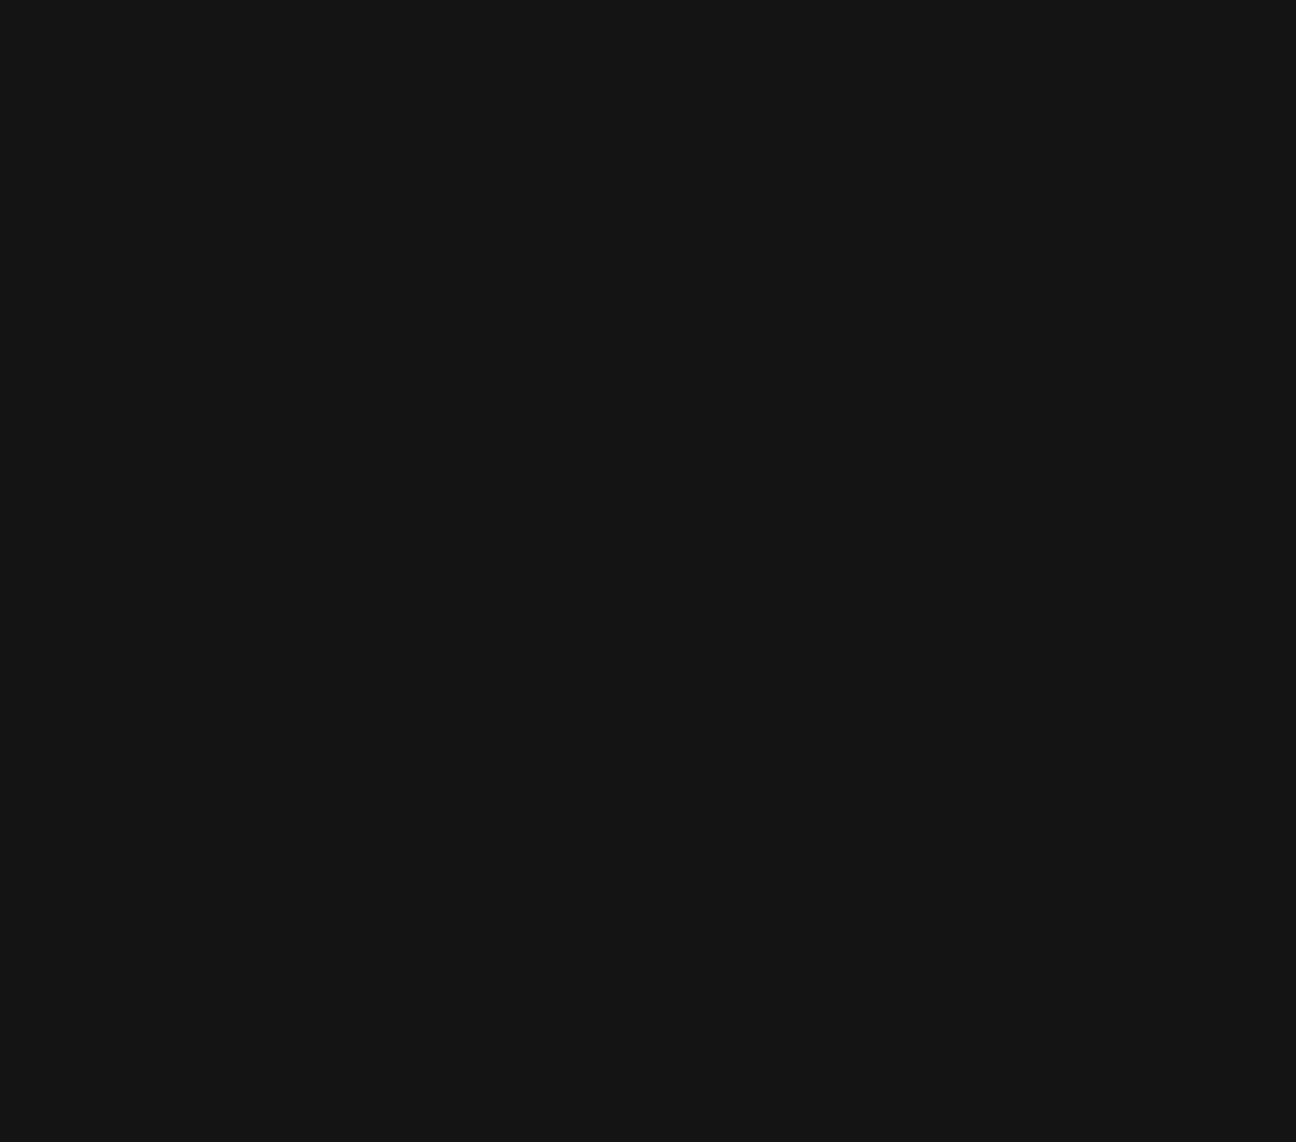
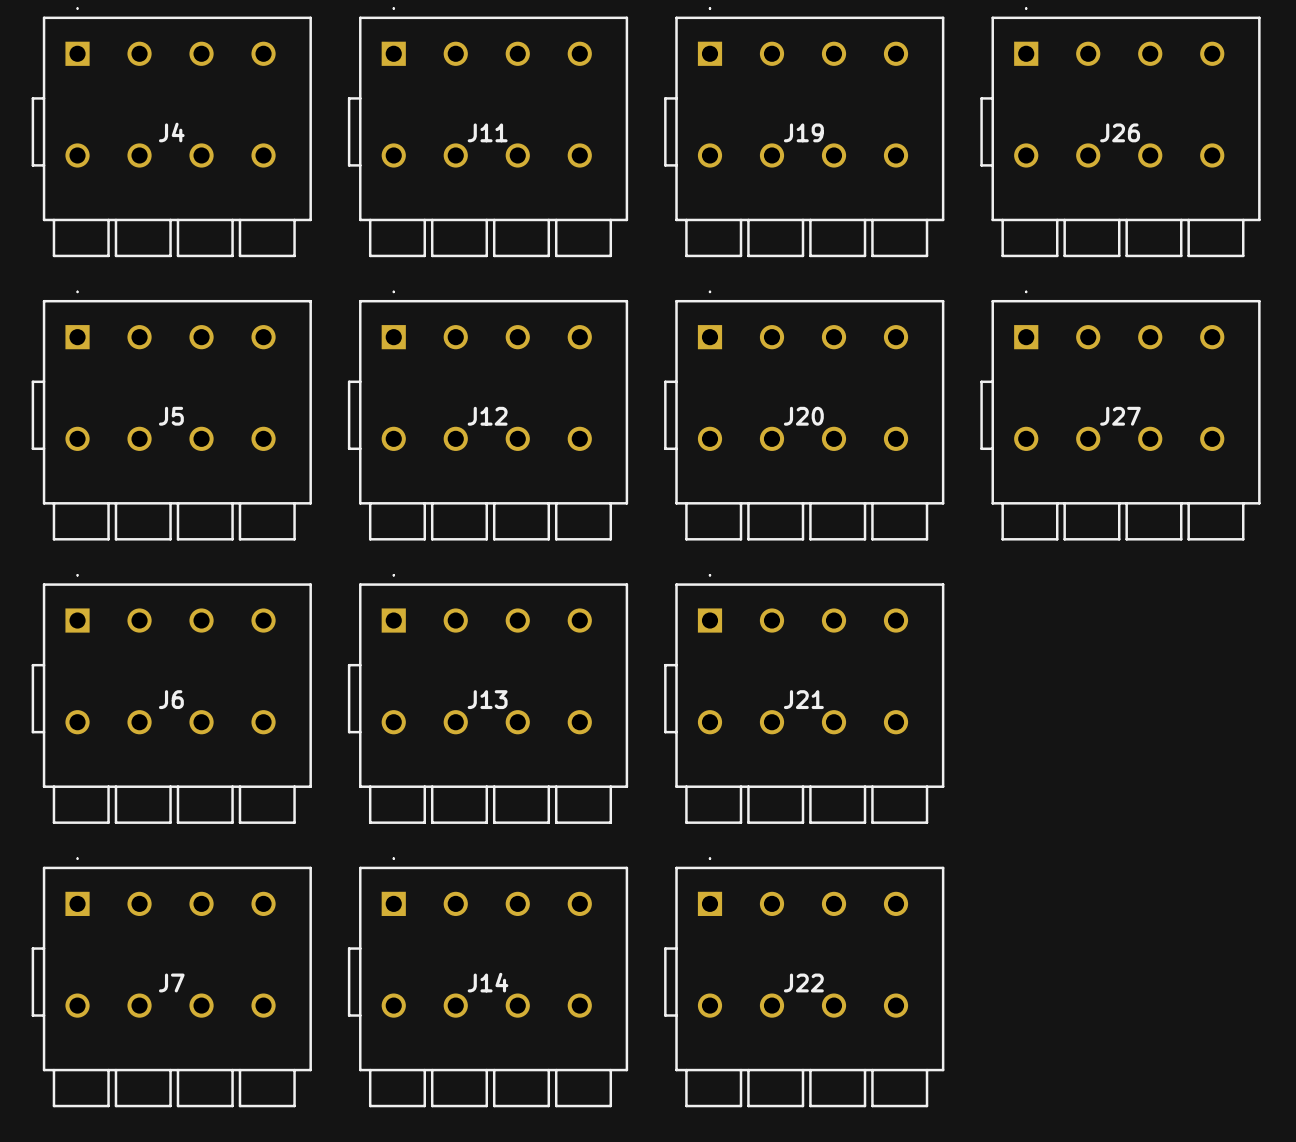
J4: none -> (171, 132)
J11: none -> (488, 132)
J19: none -> (804, 132)
J26: none -> (1120, 132)
J5: none -> (171, 415)
J12: none -> (488, 415)
J20: none -> (804, 415)
J27: none -> (1120, 415)
J6: none -> (171, 698)
J13: none -> (488, 698)
J21: none -> (804, 698)
J7: none -> (171, 982)
J14: none -> (488, 982)
J22: none -> (804, 982)

